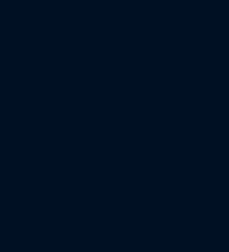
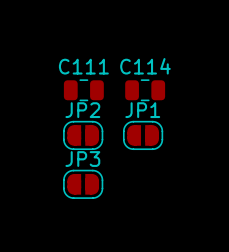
C111: none -> (83, 90)
C114: none -> (145, 90)
JP2: none -> (83, 135)
JP1: none -> (143, 135)
JP3: none -> (83, 184)

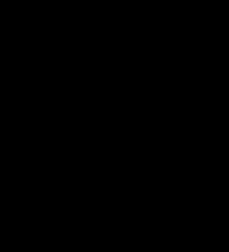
C111: (83, 90) -> none
C114: (145, 90) -> none
JP2: (83, 135) -> none
JP1: (143, 135) -> none
JP3: (83, 184) -> none

